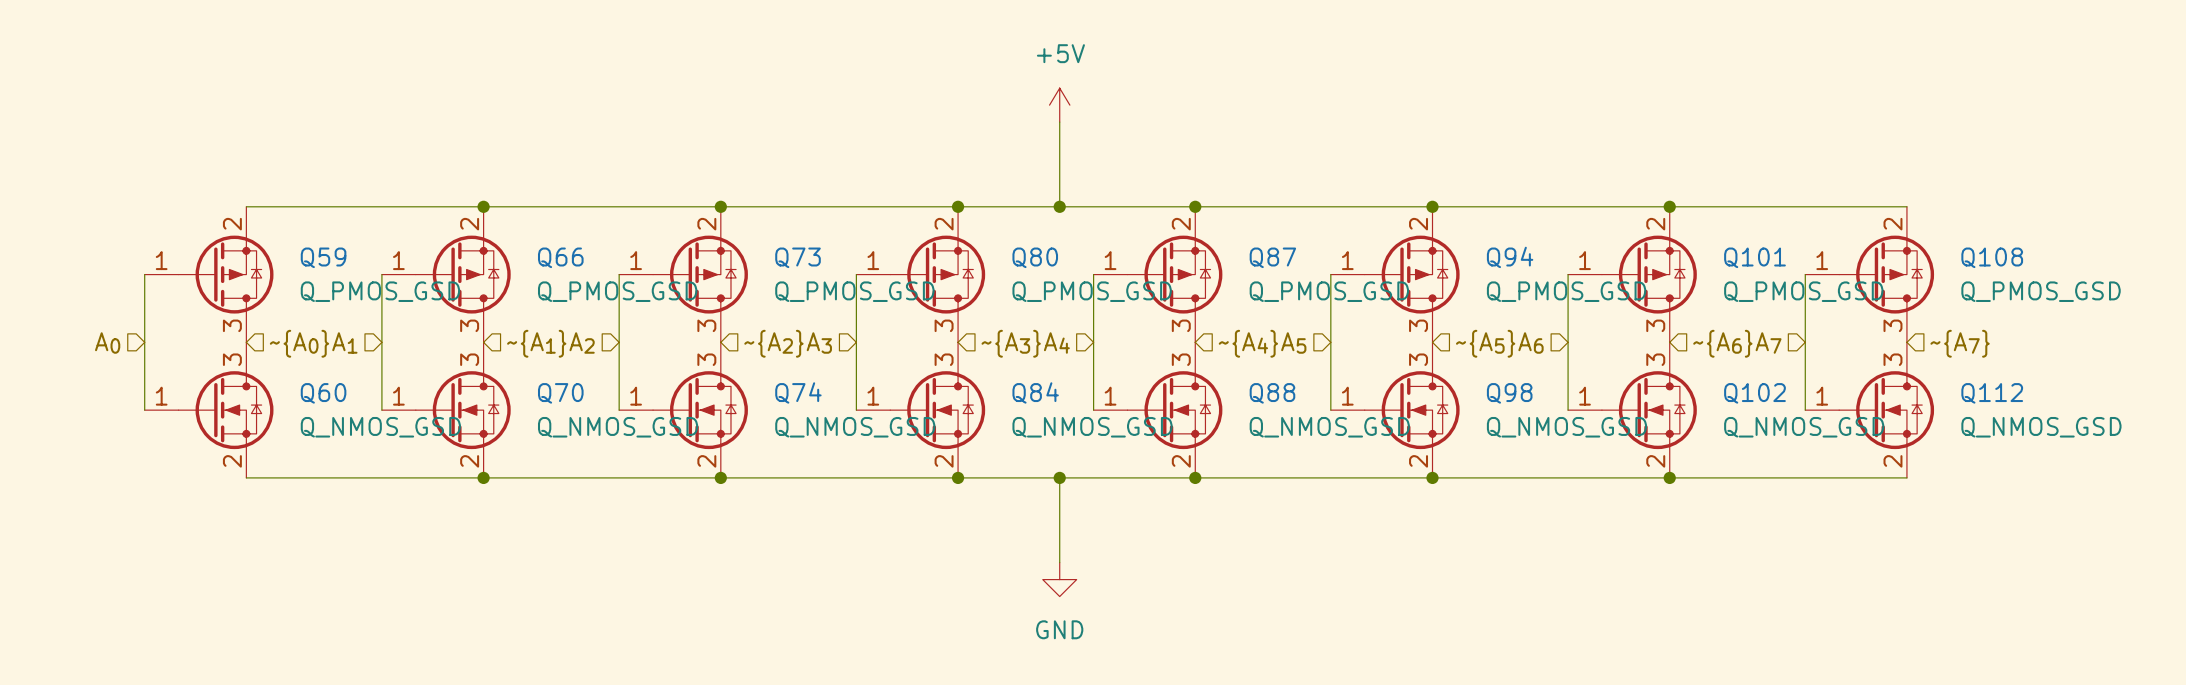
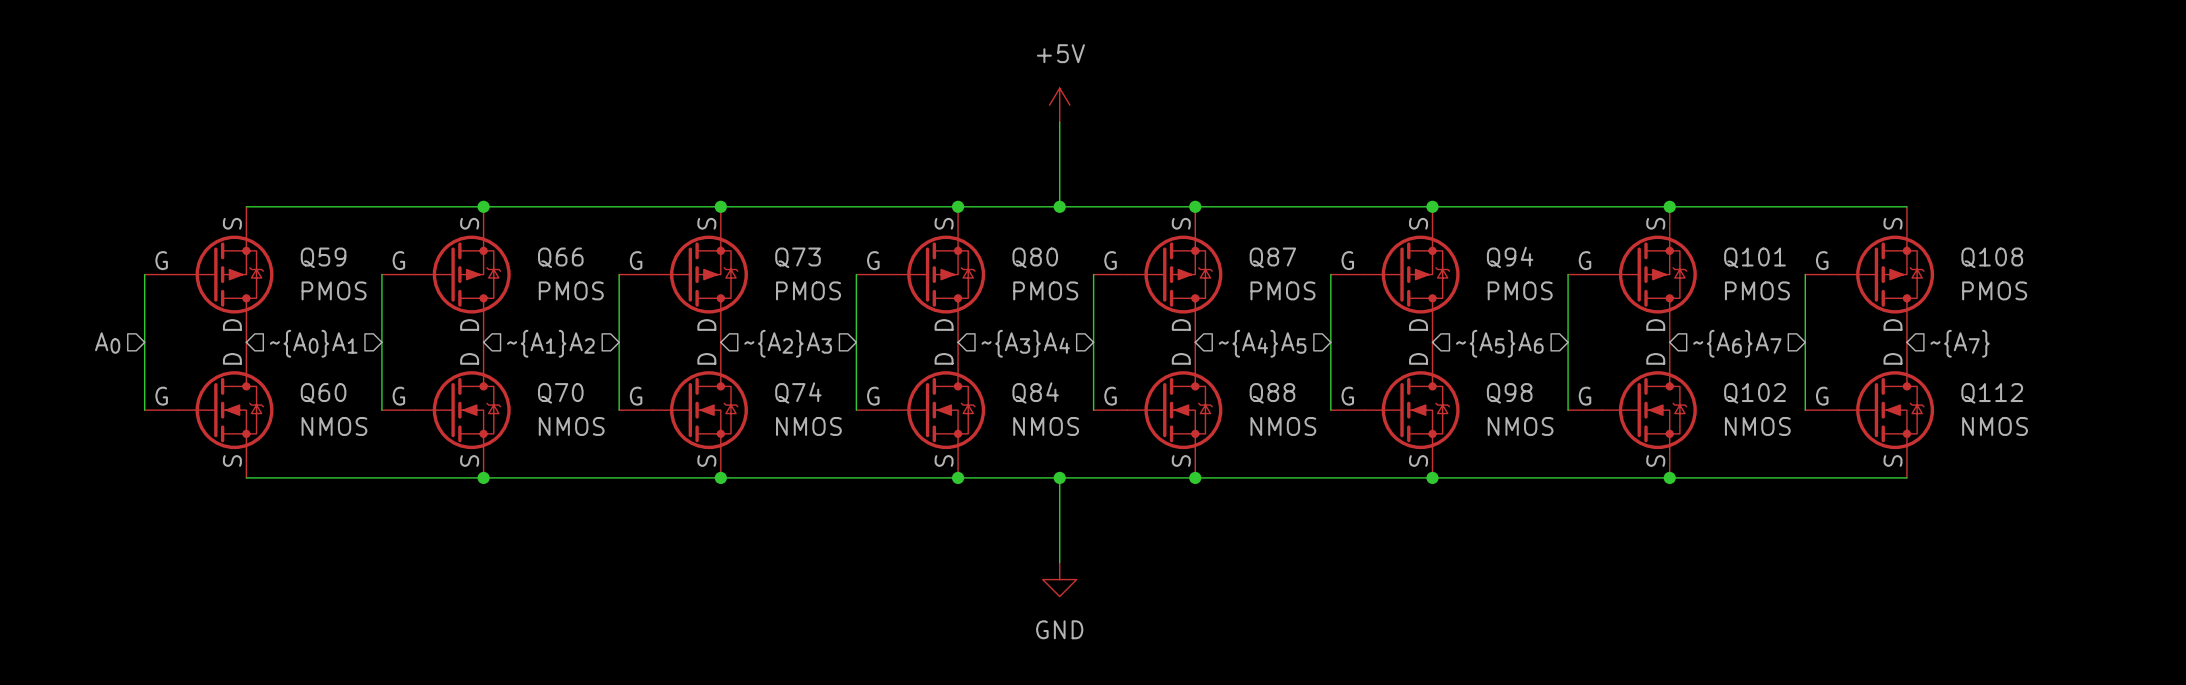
Q59 symbol: [144, 206, 274, 343] -> [144, 206, 274, 343]
Q66 symbol: [381, 206, 511, 343] -> [381, 206, 511, 343]
Q73 symbol: [619, 206, 748, 343] -> [619, 206, 748, 343]
Q80 symbol: [856, 206, 986, 343] -> [856, 206, 986, 343]
Q87 symbol: [1093, 206, 1223, 343] -> [1093, 206, 1223, 343]
Q94 symbol: [1330, 206, 1460, 343] -> [1330, 206, 1460, 343]
Q101 symbol: [1568, 206, 1697, 343] -> [1568, 206, 1697, 343]
Q108 symbol: [1805, 206, 1935, 343] -> [1805, 206, 1935, 343]
Q59 value: Q_PMOS_GSD (380, 291) -> PMOS (334, 290)
Q66 value: Q_PMOS_GSD (617, 291) -> PMOS (571, 290)
Q73 value: Q_PMOS_GSD (854, 291) -> PMOS (808, 290)
Q80 value: Q_PMOS_GSD (1092, 291) -> PMOS (1045, 290)
Q87 value: Q_PMOS_GSD (1329, 291) -> PMOS (1282, 290)
Q94 value: Q_PMOS_GSD (1566, 291) -> PMOS (1520, 290)
Q101 value: Q_PMOS_GSD (1803, 291) -> PMOS (1757, 290)
Q108 value: Q_PMOS_GSD (2041, 291) -> PMOS (1994, 290)
Q60 symbol: [144, 342, 274, 478] -> [144, 342, 274, 478]
Q70 symbol: [381, 342, 511, 478] -> [381, 342, 511, 478]
Q74 symbol: [619, 342, 748, 478] -> [619, 342, 748, 478]
Q84 symbol: [856, 342, 986, 478] -> [856, 342, 986, 478]
Q88 symbol: [1093, 342, 1223, 478] -> [1093, 342, 1223, 478]
Q98 symbol: [1330, 342, 1460, 478] -> [1330, 342, 1460, 478]
Q102 symbol: [1568, 342, 1697, 478] -> [1568, 342, 1697, 478]
Q112 symbol: [1805, 342, 1935, 478] -> [1805, 342, 1935, 478]
Q60 value: Q_NMOS_GSD (380, 427) -> NMOS (334, 426)
Q70 value: Q_NMOS_GSD (618, 427) -> NMOS (571, 426)
Q74 value: Q_NMOS_GSD (855, 427) -> NMOS (808, 426)
Q84 value: Q_NMOS_GSD (1092, 427) -> NMOS (1046, 426)
Q88 value: Q_NMOS_GSD (1329, 427) -> NMOS (1283, 426)
Q98 value: Q_NMOS_GSD (1566, 427) -> NMOS (1520, 426)
Q102 value: Q_NMOS_GSD (1804, 427) -> NMOS (1757, 426)
Q112 value: Q_NMOS_GSD (2041, 427) -> NMOS (1995, 426)

